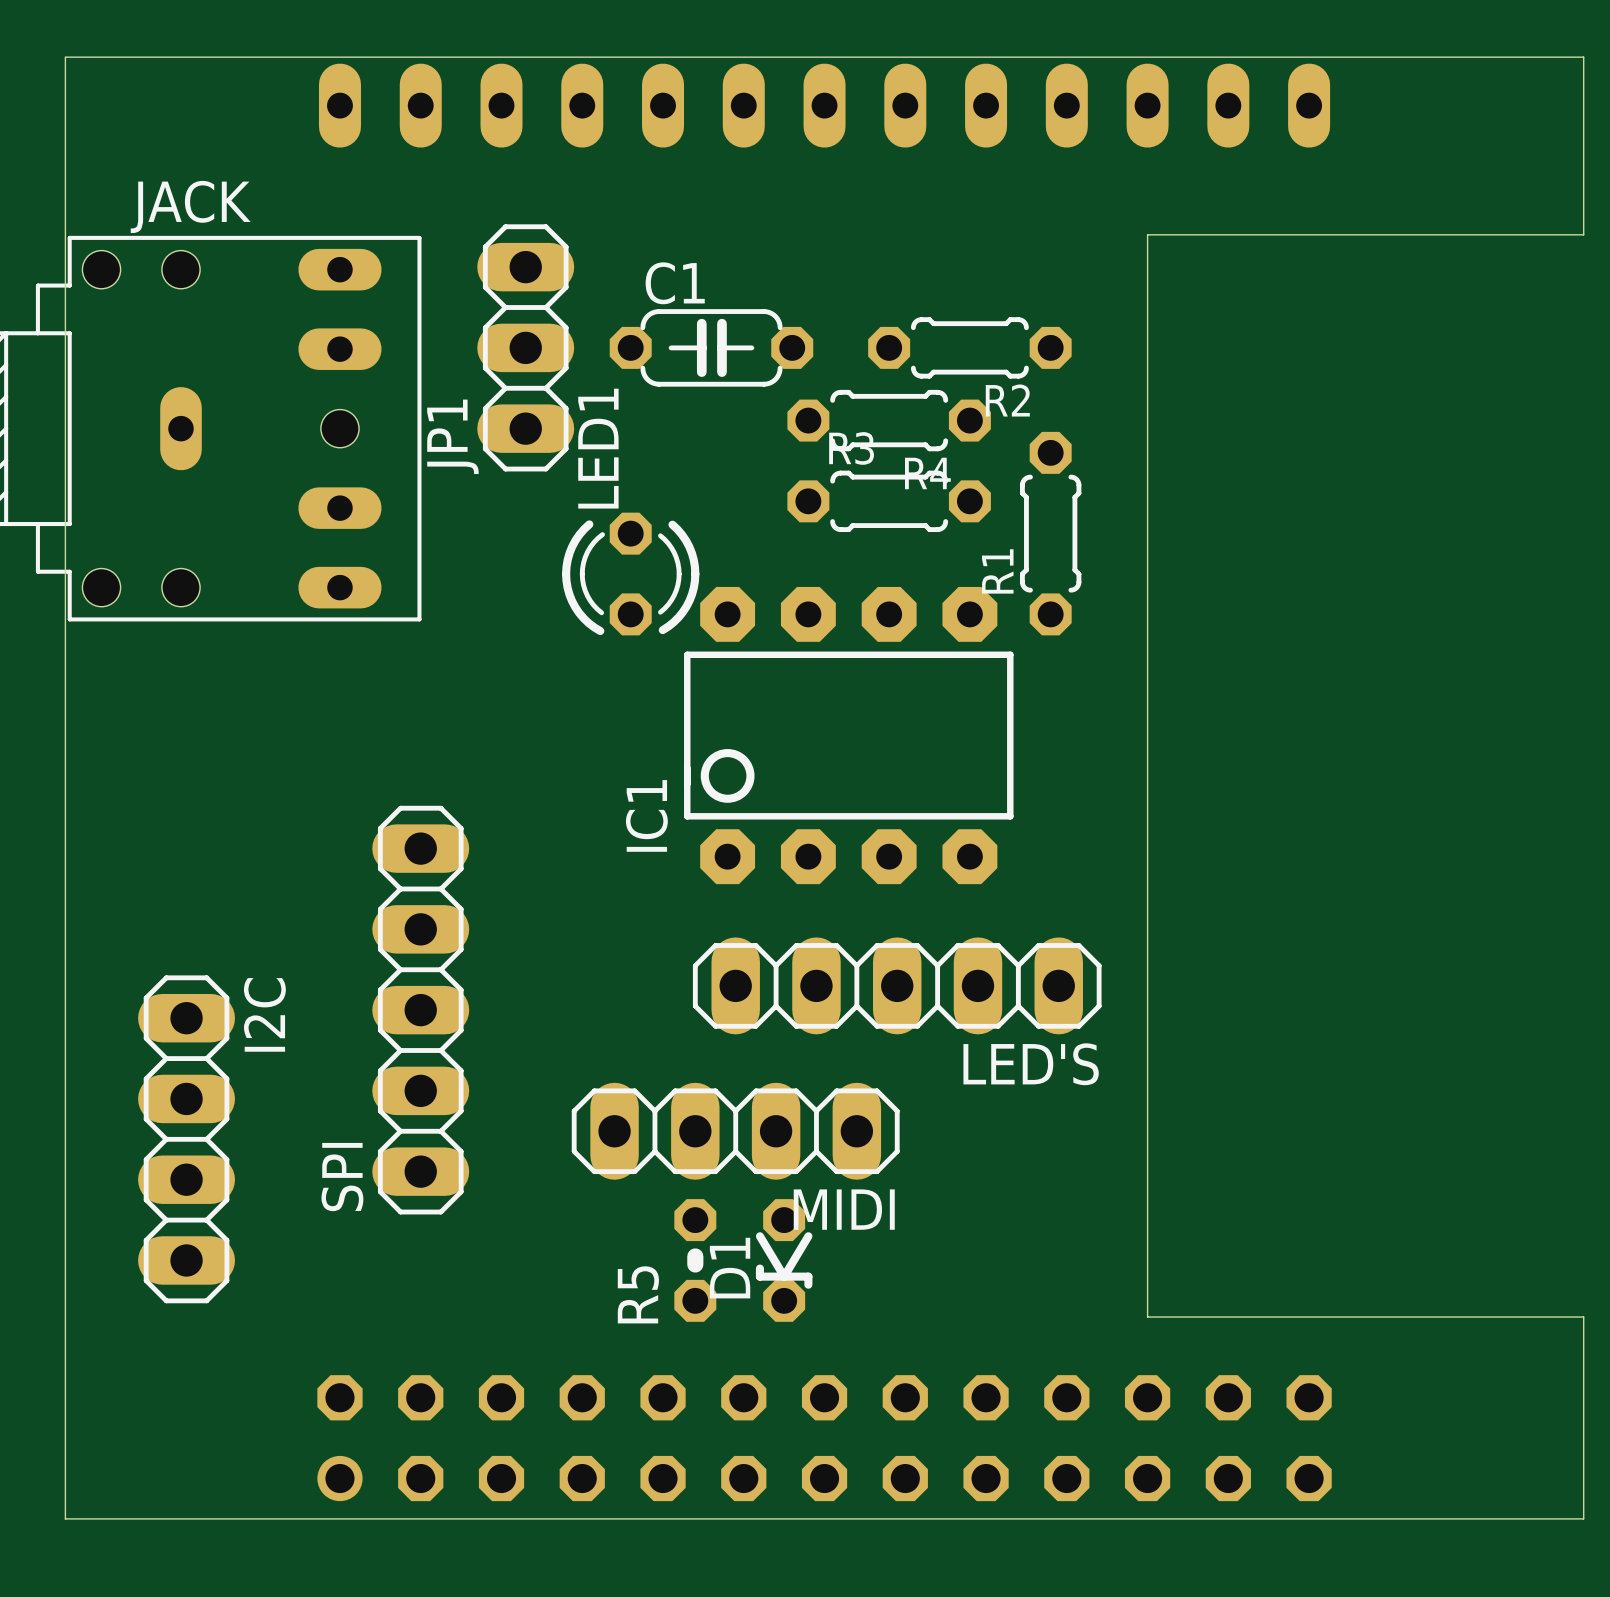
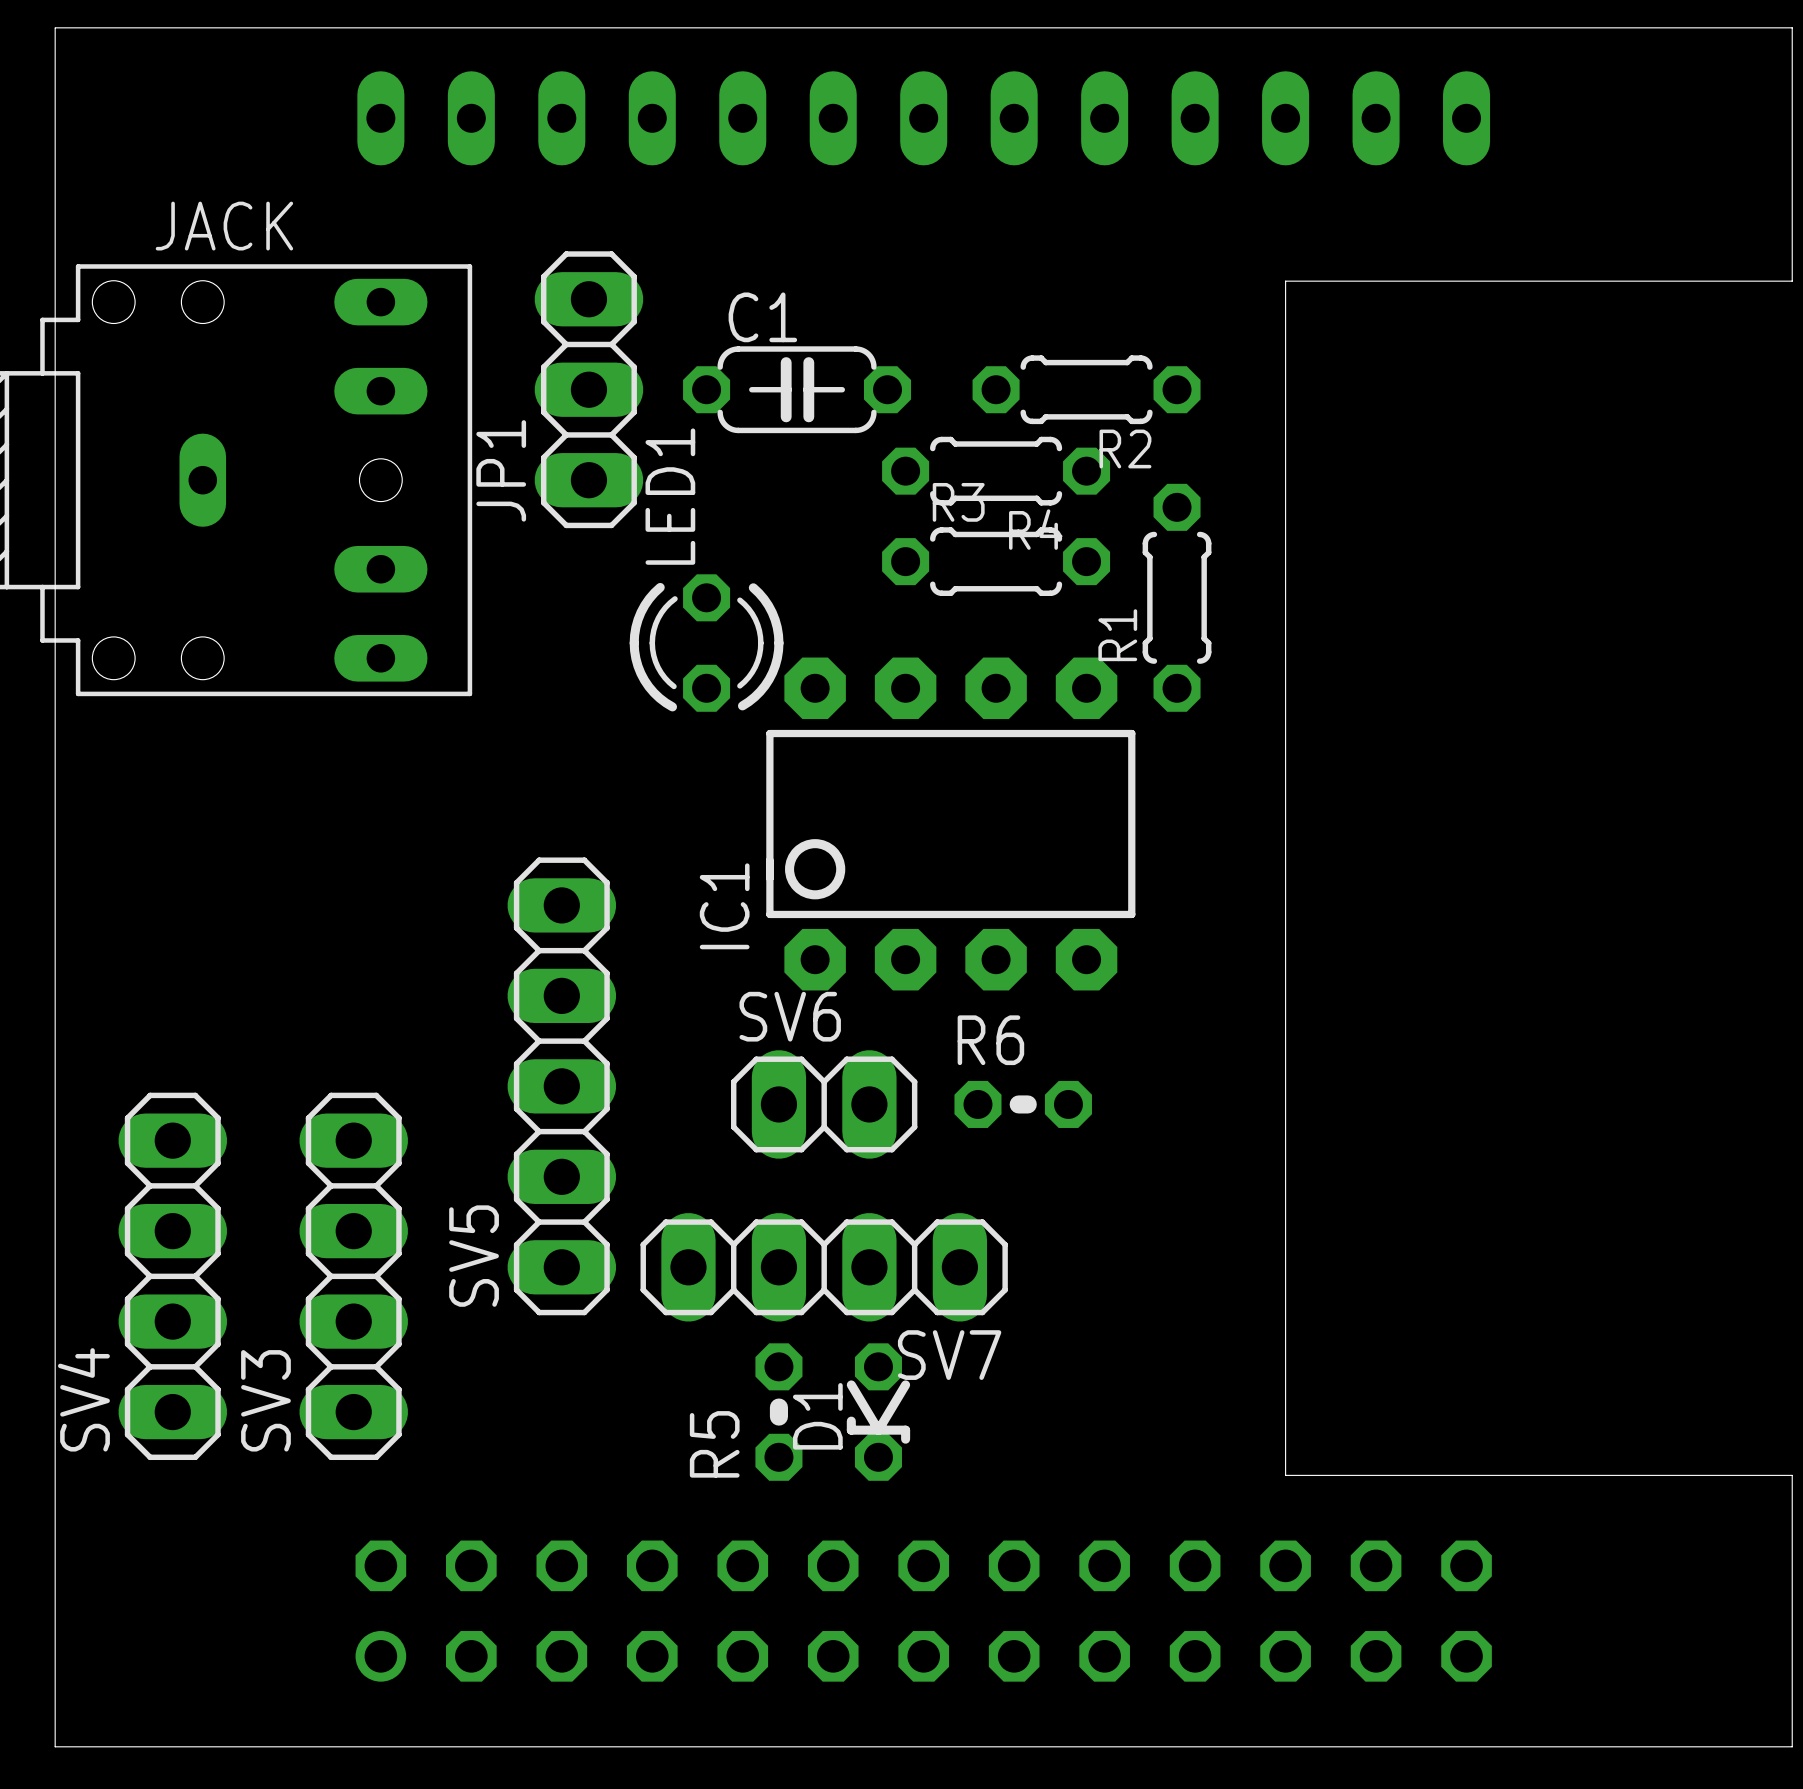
board edge: (65, 57) (1583, 57) (1583, 234) (1147, 234) (1147, 250) -> (55, 27) (1792, 27) (1792, 281) (1285, 281)
board edge: (65, 57) (65, 1518) (1583, 1518) (1583, 1317) -> (55, 28) (55, 1746) (1792, 1746) (1792, 1475) (1774, 1475)
SV5: none -> (561, 1086)
SV6: none -> (824, 1104)
LED'S: (897, 985) -> none
R6: none -> (1023, 1104)
SPI: (420, 1010) -> none
SV4: none -> (172, 1276)
I2C: (186, 1139) -> none
SV3: none -> (353, 1276)
MIDI name: MIDI (844, 1209) -> SV7 (949, 1355)

